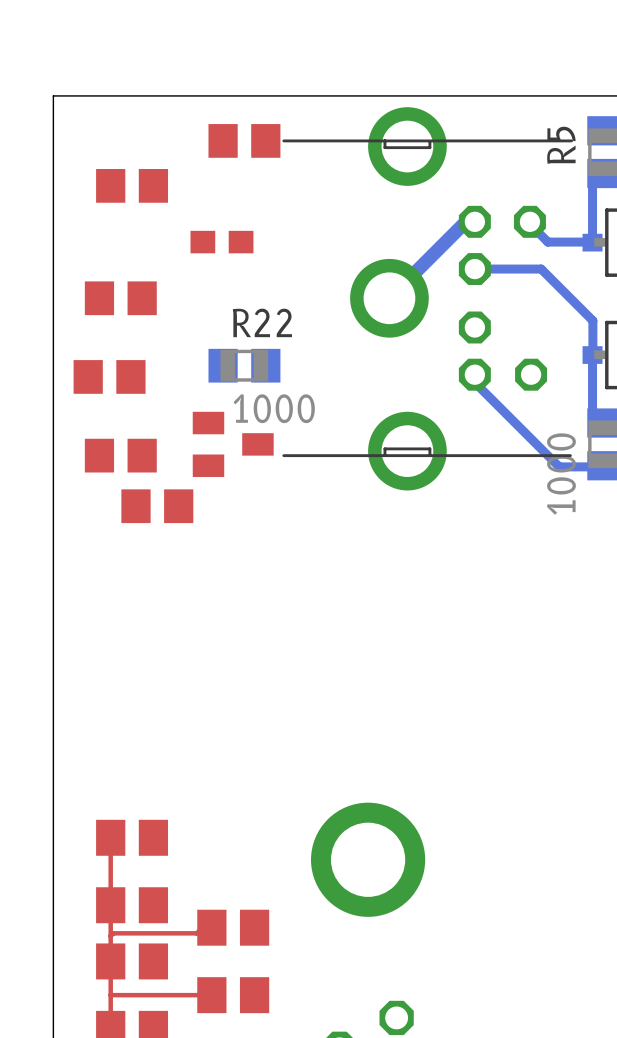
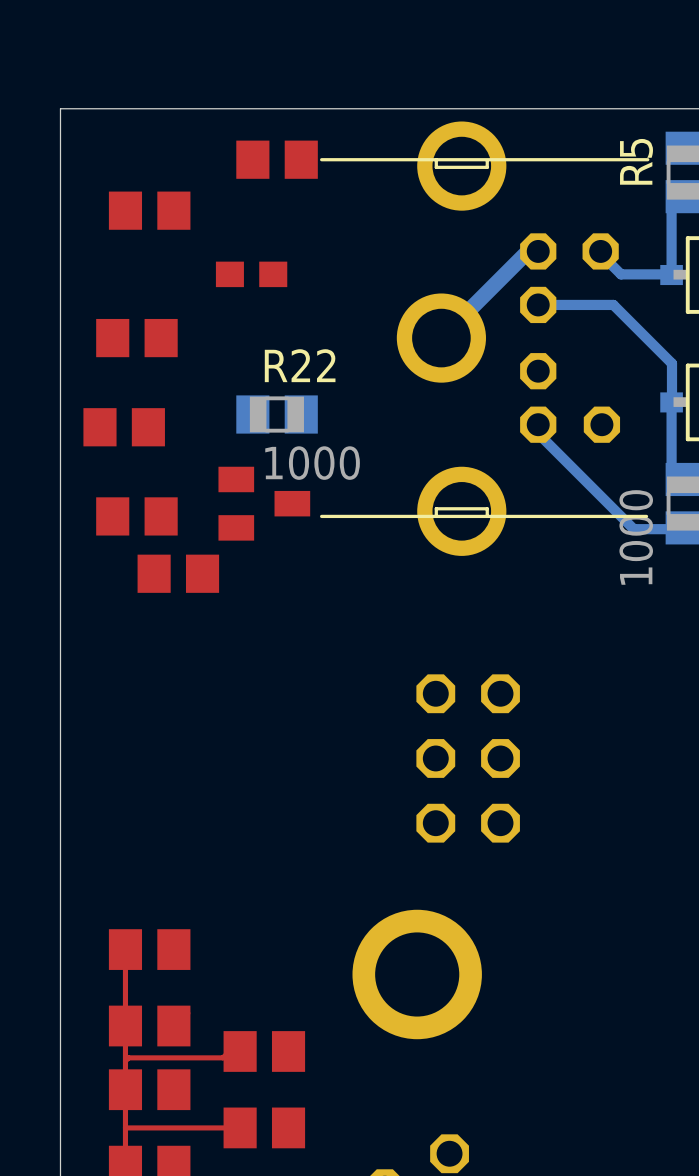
part: none -> (468, 758)

